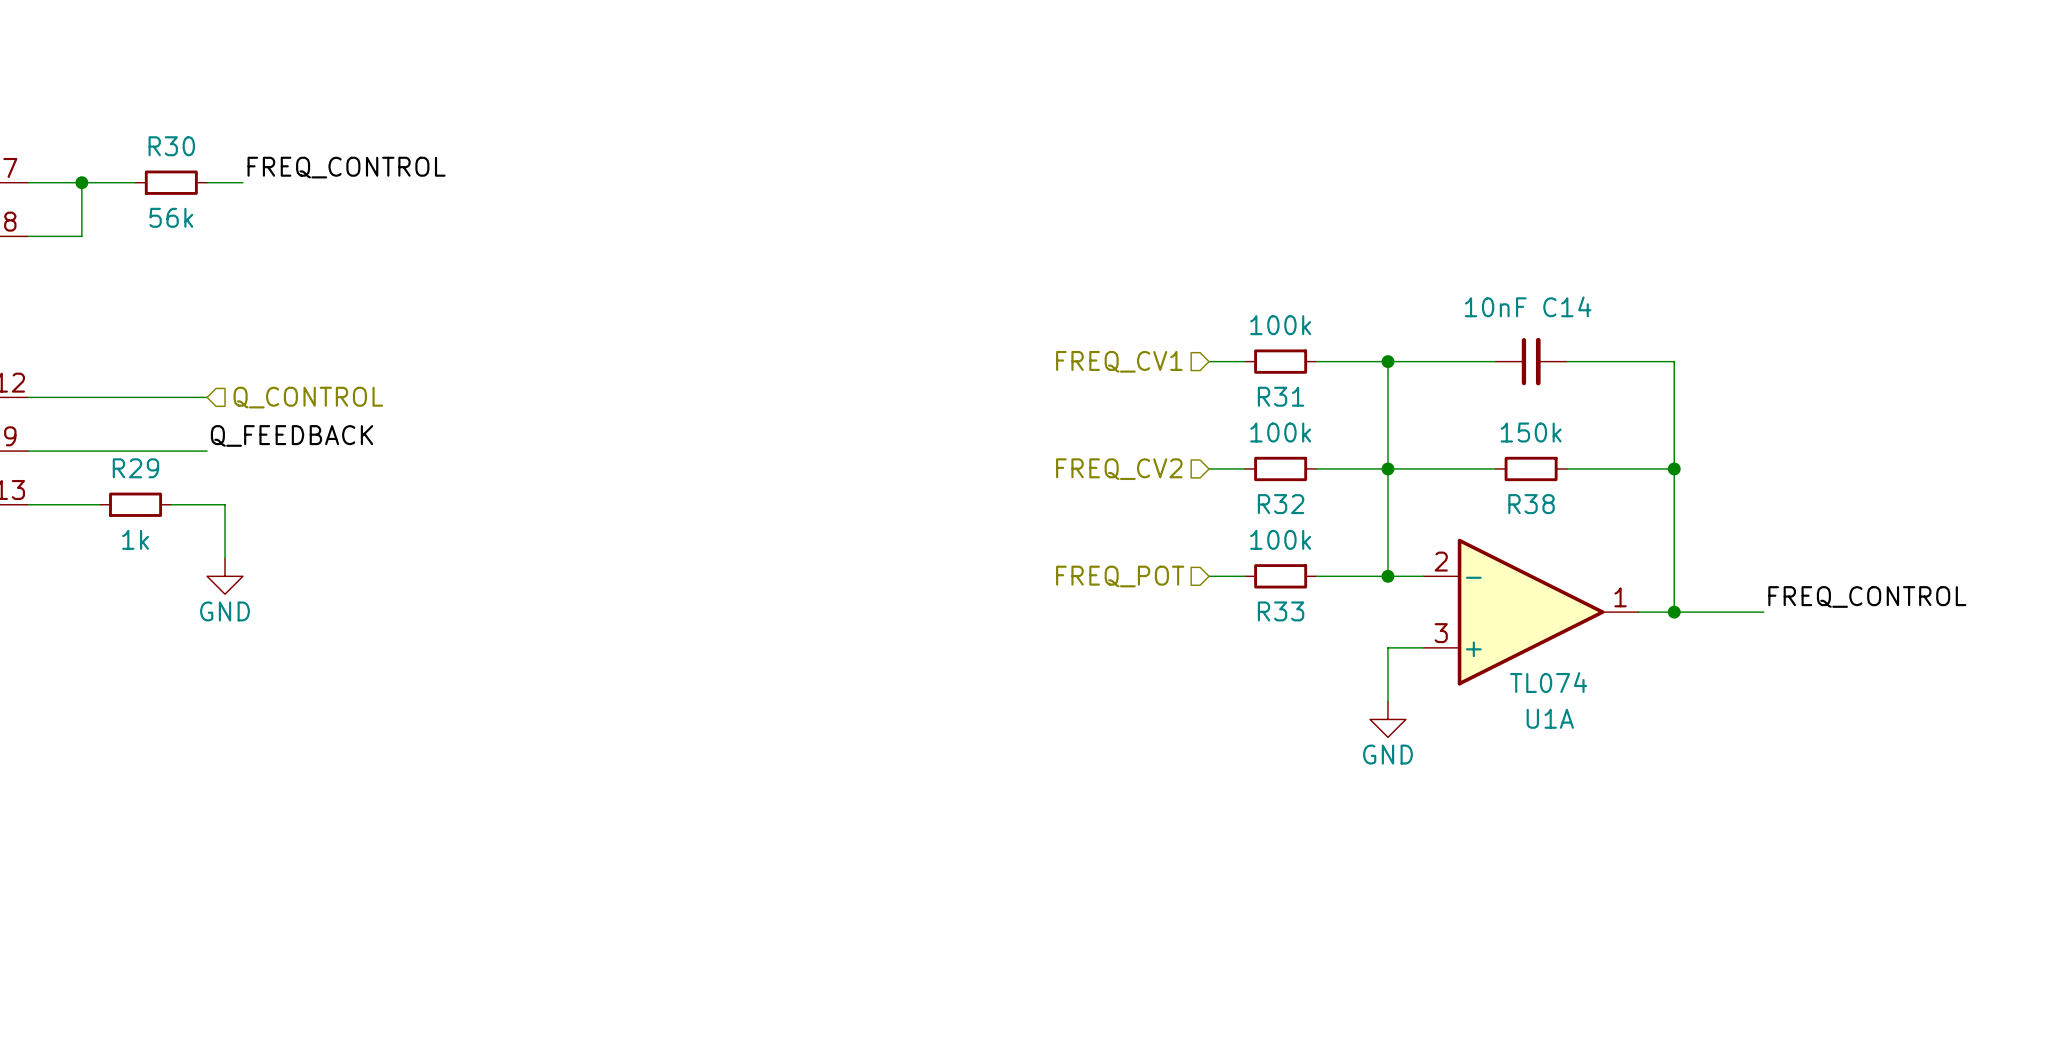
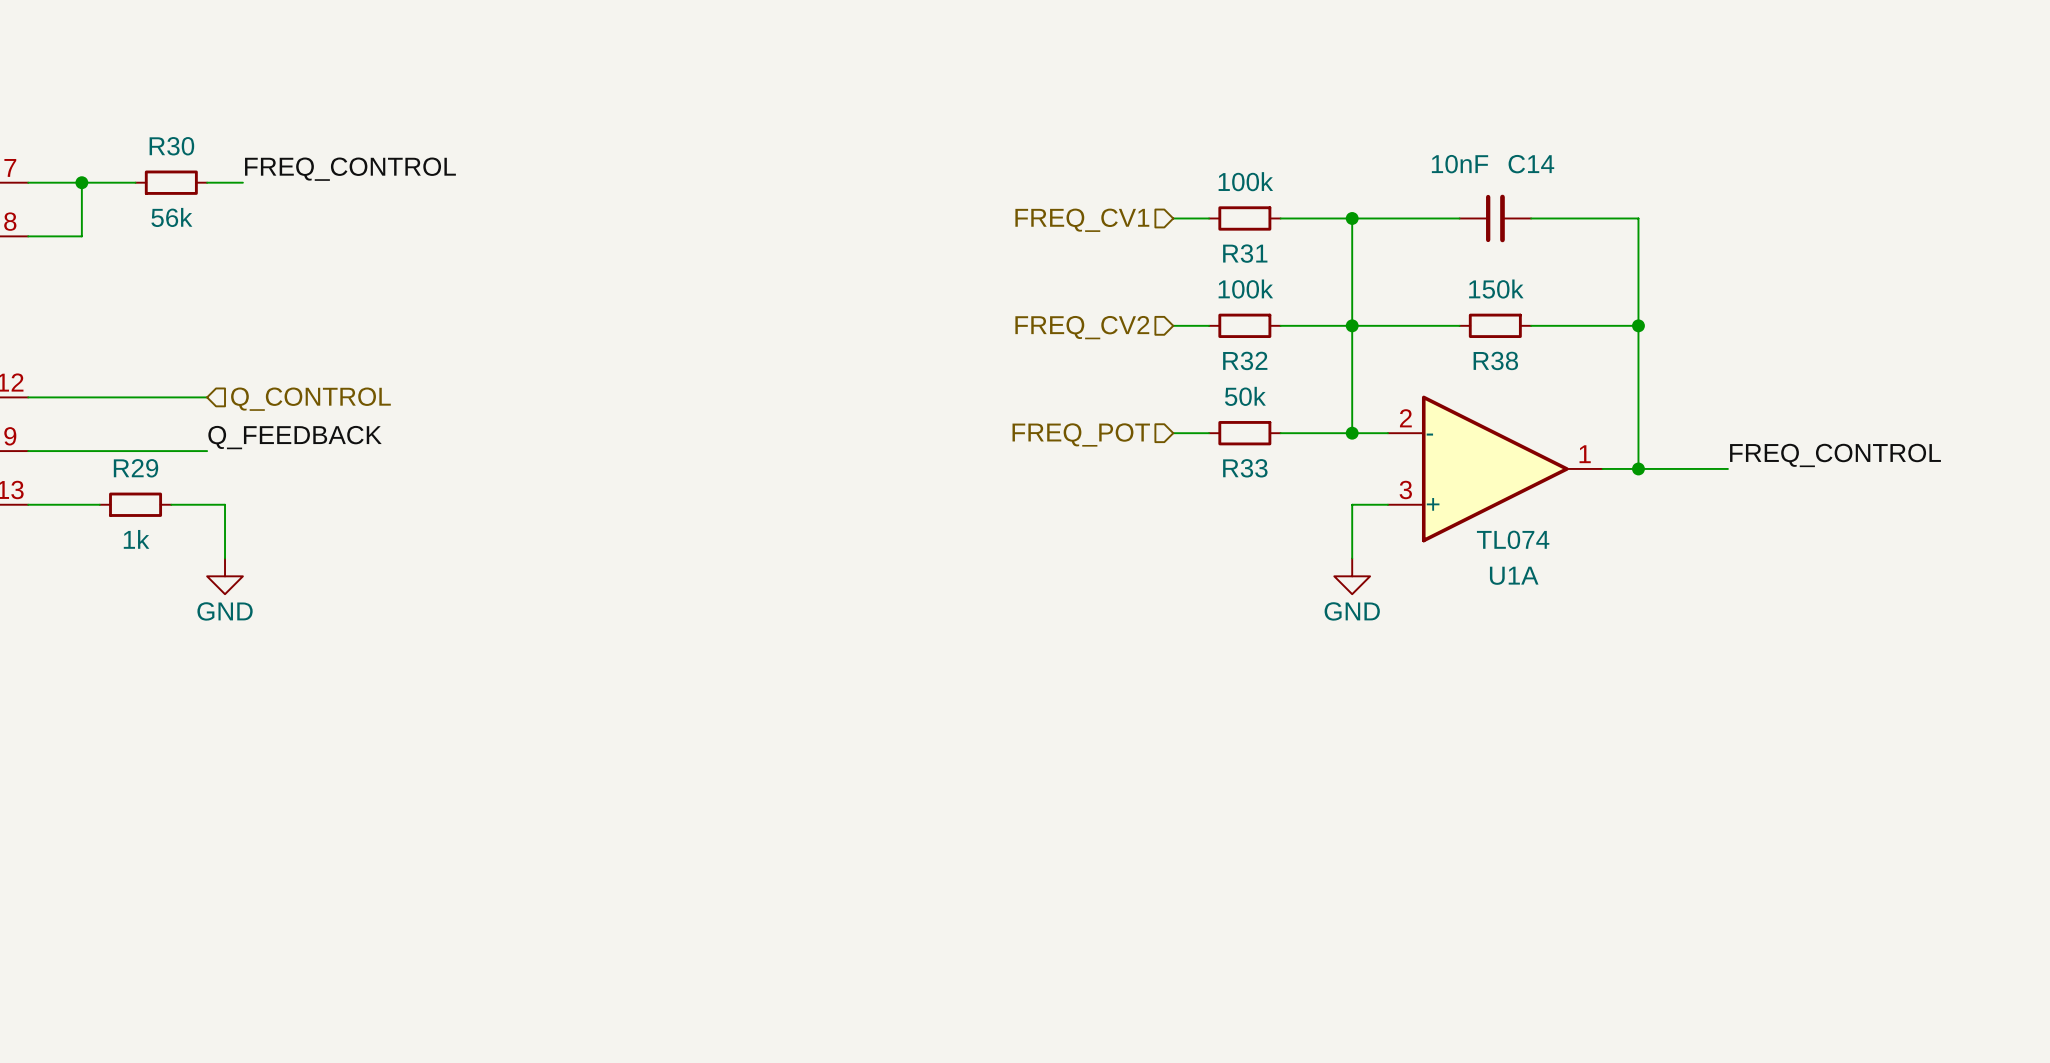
junction: none -> (1352, 218)
junction: none -> (1352, 325)
wire: none -> (1531, 325) (1638, 325)
junction: none -> (1638, 325)
hierarchical label position: FREQ_CV1 (1119, 361) -> FREQ_CV1 (1082, 220)
wire: (1209, 361) (1244, 361) -> (1173, 218) (1209, 218)
R31 position: (1280, 361) -> (1244, 218)
wire: (1316, 361) (1495, 361) -> (1280, 218) (1459, 218)
wire: (1387, 361) (1387, 576) -> (1352, 218) (1352, 433)
junction: (1387, 361) -> none
C14 position: (1531, 361) -> (1495, 218)
wire: (1566, 361) (1674, 361) (1674, 612) -> (1531, 218) (1638, 218) (1638, 468)
junction: none -> (1352, 433)
wire: (1209, 468) (1244, 468) -> (1173, 325) (1209, 325)
R32 position: (1280, 468) -> (1244, 325)
wire: (1316, 468) (1495, 468) -> (1280, 325) (1459, 325)
junction: (1387, 468) -> none
R38 position: (1531, 468) -> (1495, 325)
wire: none -> (1674, 468) (1727, 468)
junction position: (1674, 468) -> (1638, 468)
hierarchical label position: FREQ_CV2 (1119, 469) -> FREQ_CV2 (1082, 327)
R33 value: 100k (1280, 539) -> 50k (1245, 396)
hierarchical label position: FREQ_POT (1120, 576) -> FREQ_POT (1081, 434)
wire: (1209, 576) (1244, 576) -> (1173, 433) (1209, 433)
R33 position: (1280, 576) -> (1244, 433)
wire: (1316, 576) (1423, 576) -> (1280, 433) (1387, 433)
junction: (1387, 576) -> none
label position: FREQ_CONTROL (1867, 596) -> FREQ_CONTROL (1835, 455)
U1A position: (1531, 612) -> (1495, 468)
wire: (1638, 612) (1763, 612) -> none
junction: (1674, 612) -> none
wire: (1423, 647) (1387, 647) (1387, 701) -> (1387, 504) (1352, 504) (1352, 558)
power symbol position: GND (1387, 719) -> GND (1352, 576)

